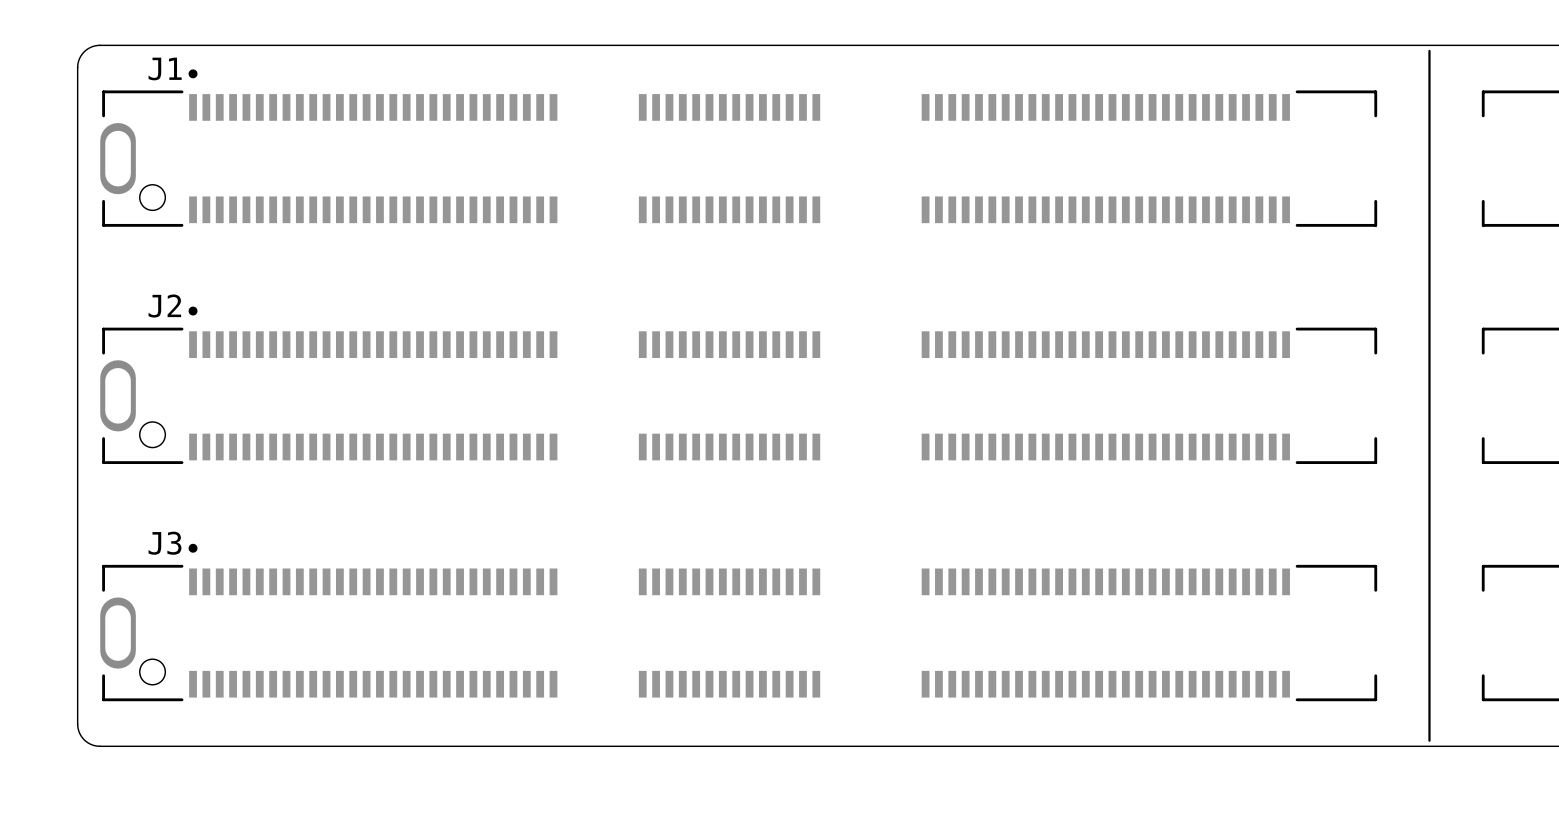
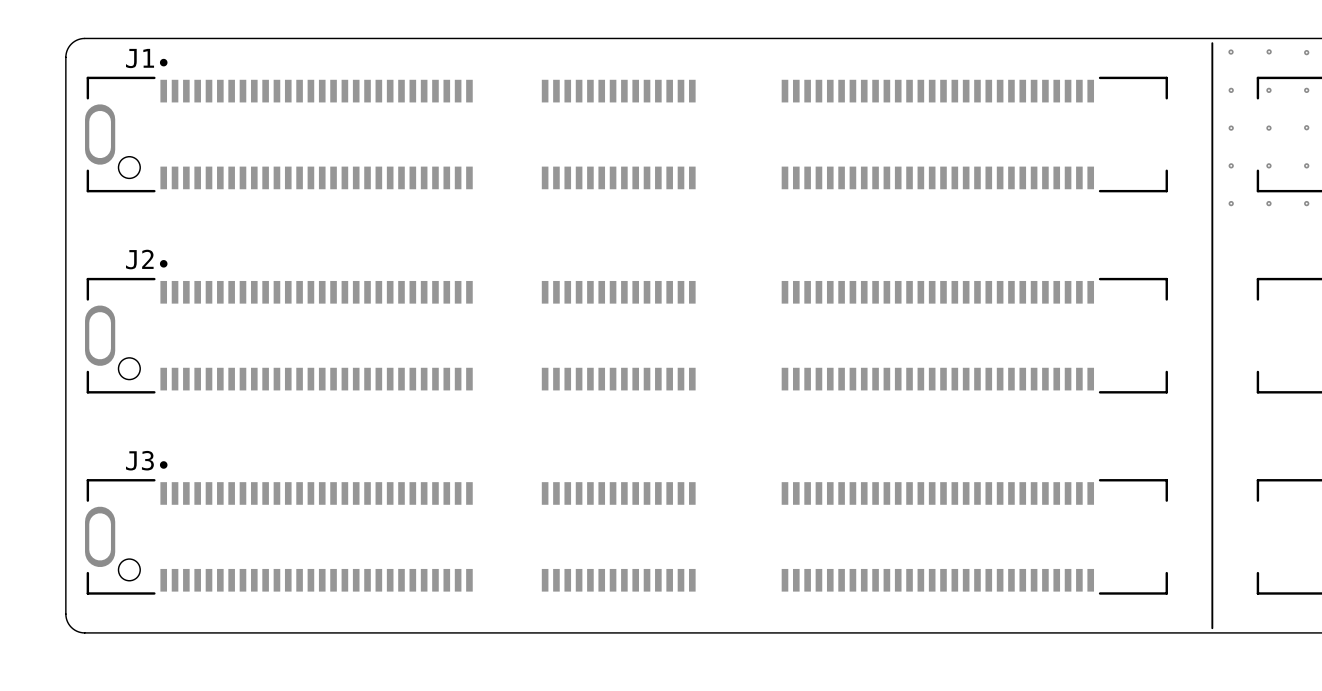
via: none -> (1231, 52)
via: none -> (1269, 51)
via: none -> (1306, 52)
via: none -> (1231, 90)
via: none -> (1268, 90)
via: none -> (1306, 90)
via: none -> (1306, 127)
via: none -> (1231, 128)
via: none -> (1268, 128)
via: none -> (1231, 165)
via: none -> (1268, 165)
via: none -> (1306, 165)
via: none -> (1231, 203)
via: none -> (1268, 203)
via: none -> (1306, 203)

